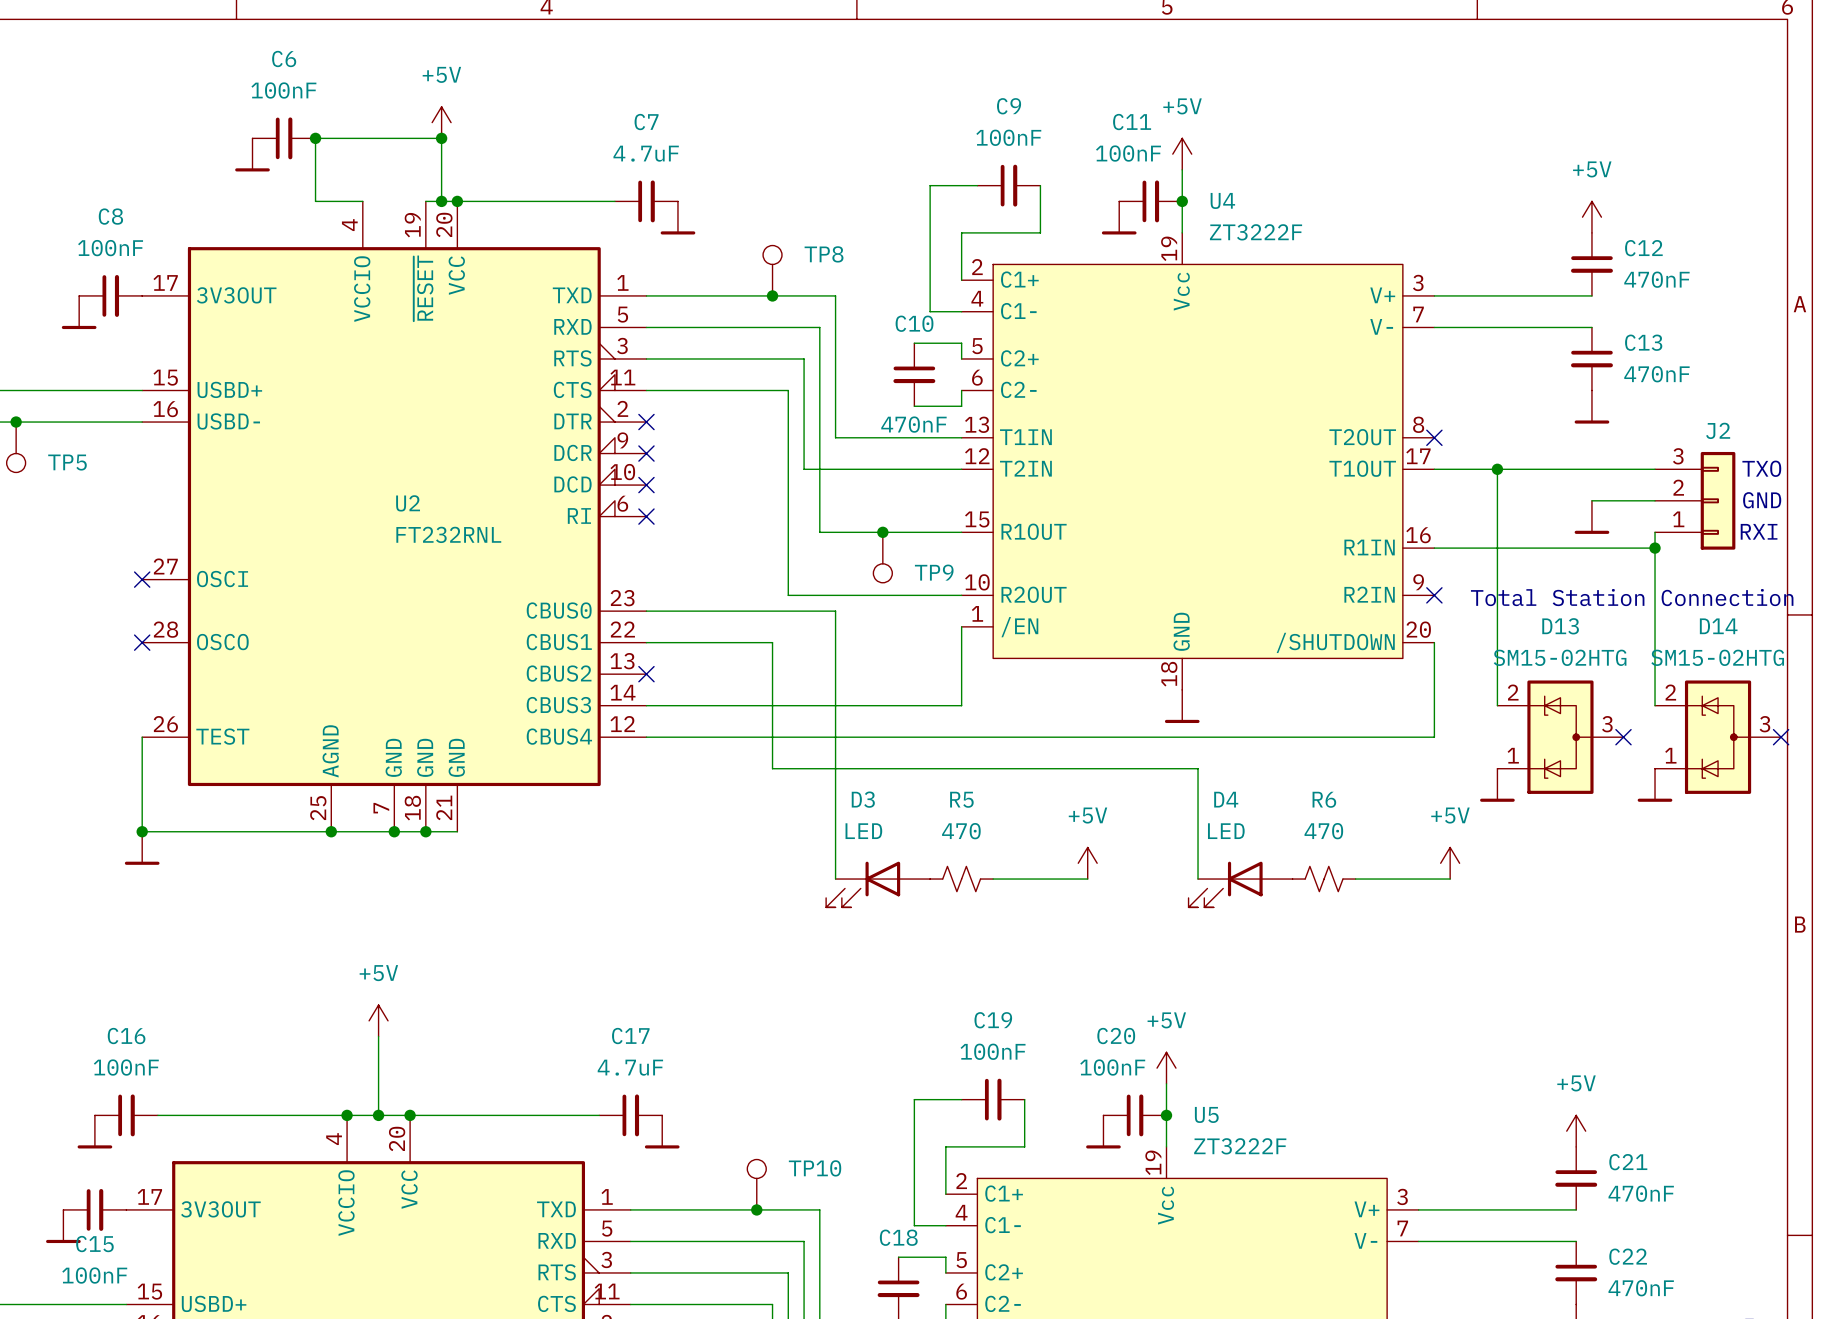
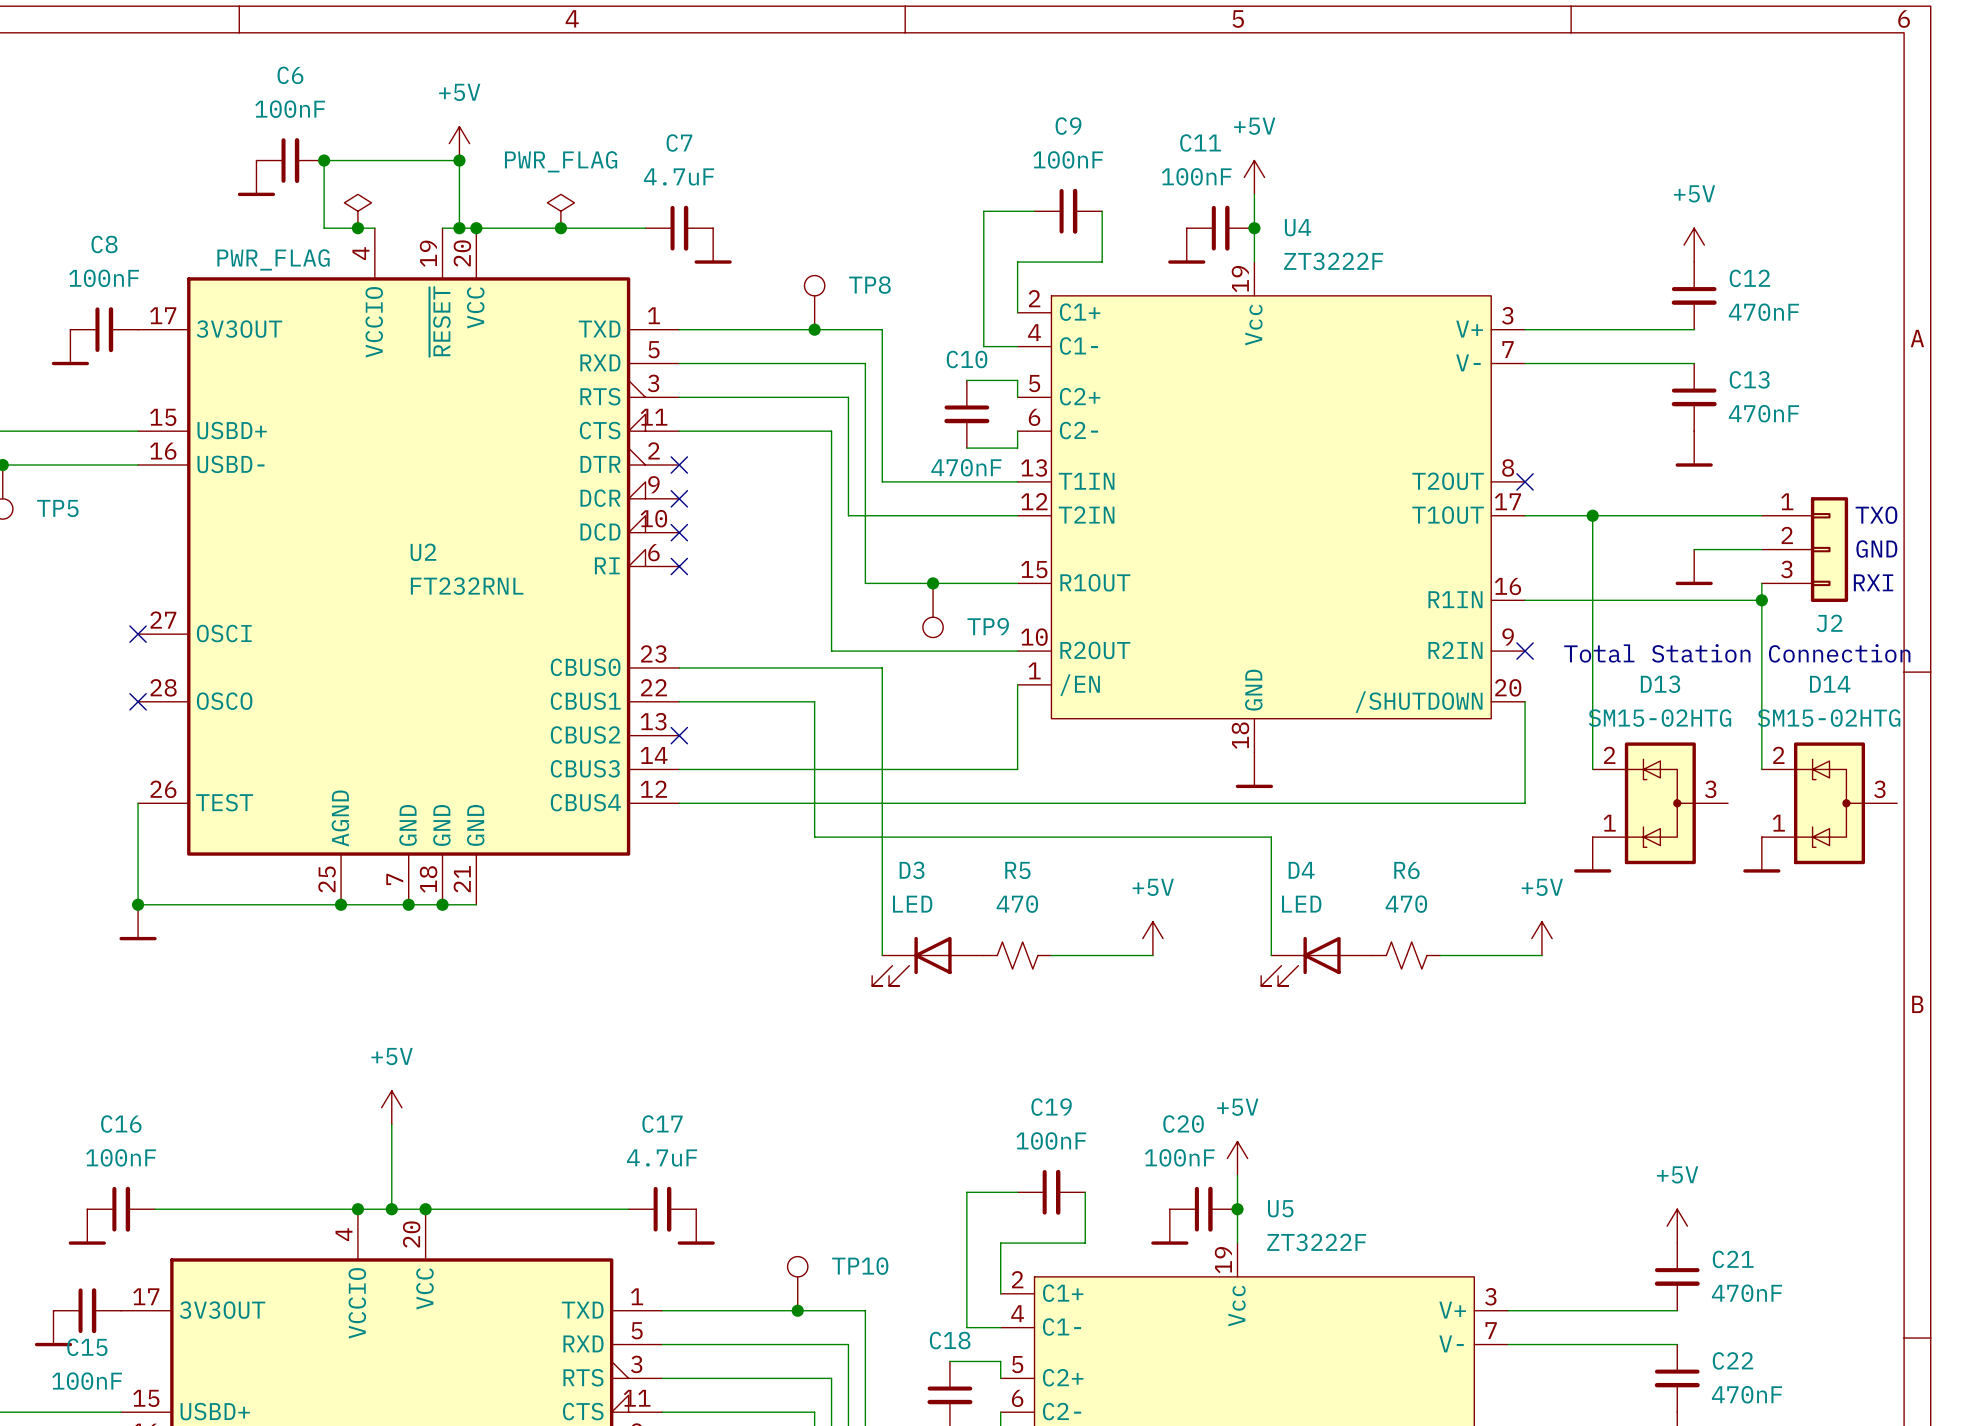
power symbol: none -> PWR_FLAG (357, 211)
power symbol: none -> PWR_FLAG (560, 211)
junction: none -> (357, 228)
junction: none -> (560, 228)
J2 flip: as is (1718, 500) -> up-down (1829, 549)
no-connect mark: (1623, 737) -> none
no-connect mark: (1781, 737) -> none

